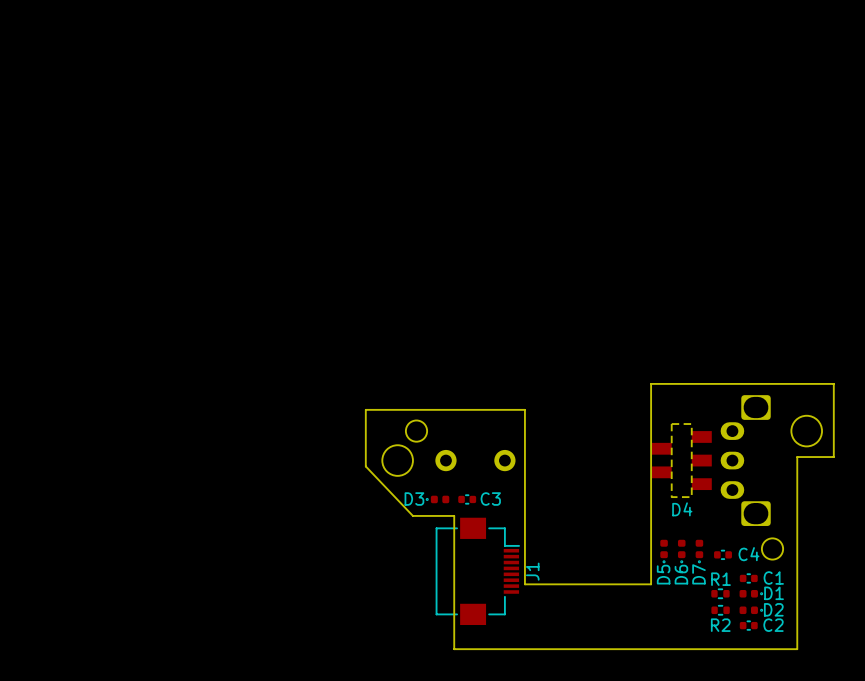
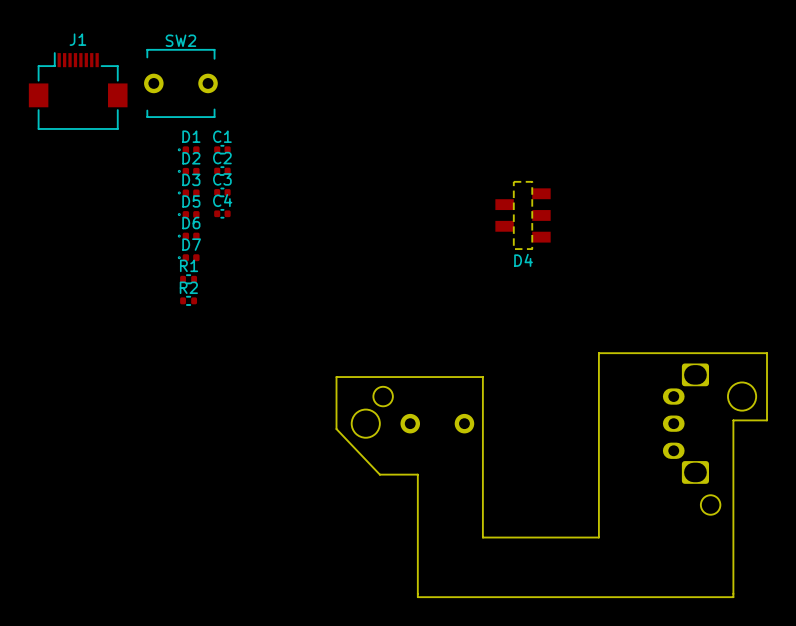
SW2: none -> (180, 83)
D4 position: (681, 460) -> (523, 215)
D3 name position: D3 (414, 499) -> D3 (191, 179)
D3 position: (437, 499) -> (188, 192)
C3 position: (467, 499) -> (222, 192)
C3 name position: C3 (490, 499) -> C3 (222, 179)
D5 rotation: 0° (664, 551) -> 90° clockwise (188, 214)
D5 position: (664, 551) -> (188, 214)
D6 rotation: 0° (681, 551) -> 90° clockwise (188, 236)
D6 position: (681, 551) -> (188, 236)
D7 rotation: 0° (699, 551) -> 90° clockwise (188, 257)
D7 position: (699, 551) -> (188, 257)
C4 position: (723, 554) -> (222, 213)
C4 name position: C4 (748, 554) -> C4 (222, 200)
J1 rotation: 0° (477, 571) -> 90° counterclockwise (78, 91)
J1 position: (477, 571) -> (78, 91)
D5 name position: D5 (663, 574) -> D5 (191, 201)
D6 name position: D6 (681, 574) -> D6 (191, 223)
D7 name position: D7 (698, 574) -> D7 (191, 244)
C1 position: (748, 578) -> (222, 149)
C1 name position: C1 (773, 578) -> C1 (222, 136)
R1 position: (720, 593) -> (188, 279)
D1 rotation: 0° (751, 593) -> 180° (188, 149)
D1 position: (751, 593) -> (188, 149)
D1 name position: D1 (774, 593) -> D1 (191, 136)
D2 name position: D2 (773, 609) -> D2 (191, 158)
R2 position: (720, 610) -> (188, 300)
D2 rotation: 0° (751, 610) -> 180° (188, 171)
D2 position: (751, 610) -> (188, 171)
R2 name position: R2 (720, 625) -> R2 (188, 287)
C2 position: (748, 625) -> (222, 171)
C2 name position: C2 (773, 625) -> C2 (222, 158)

